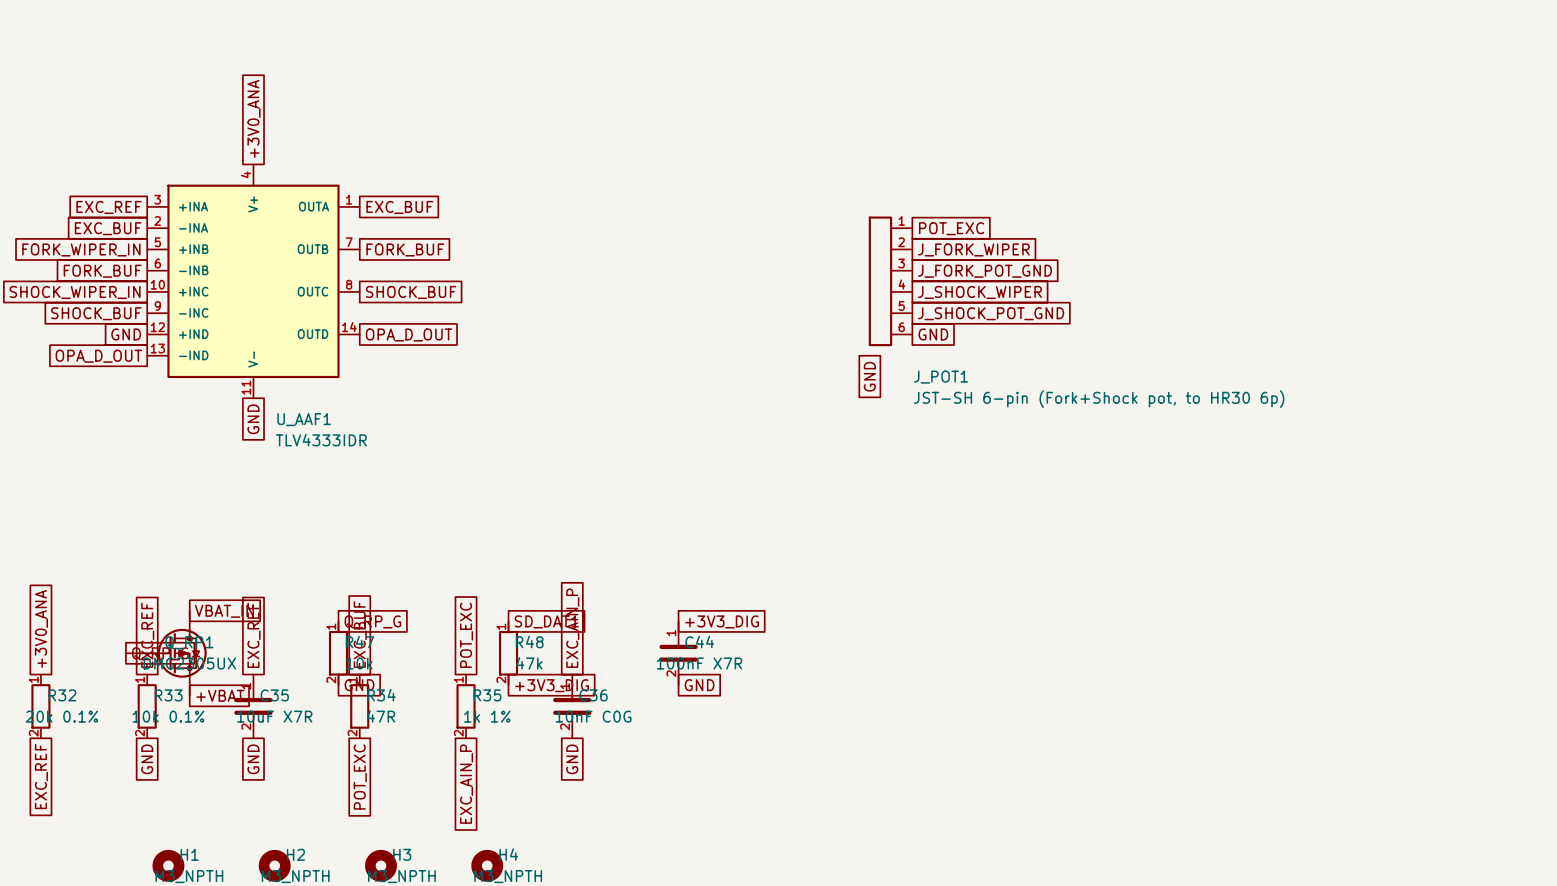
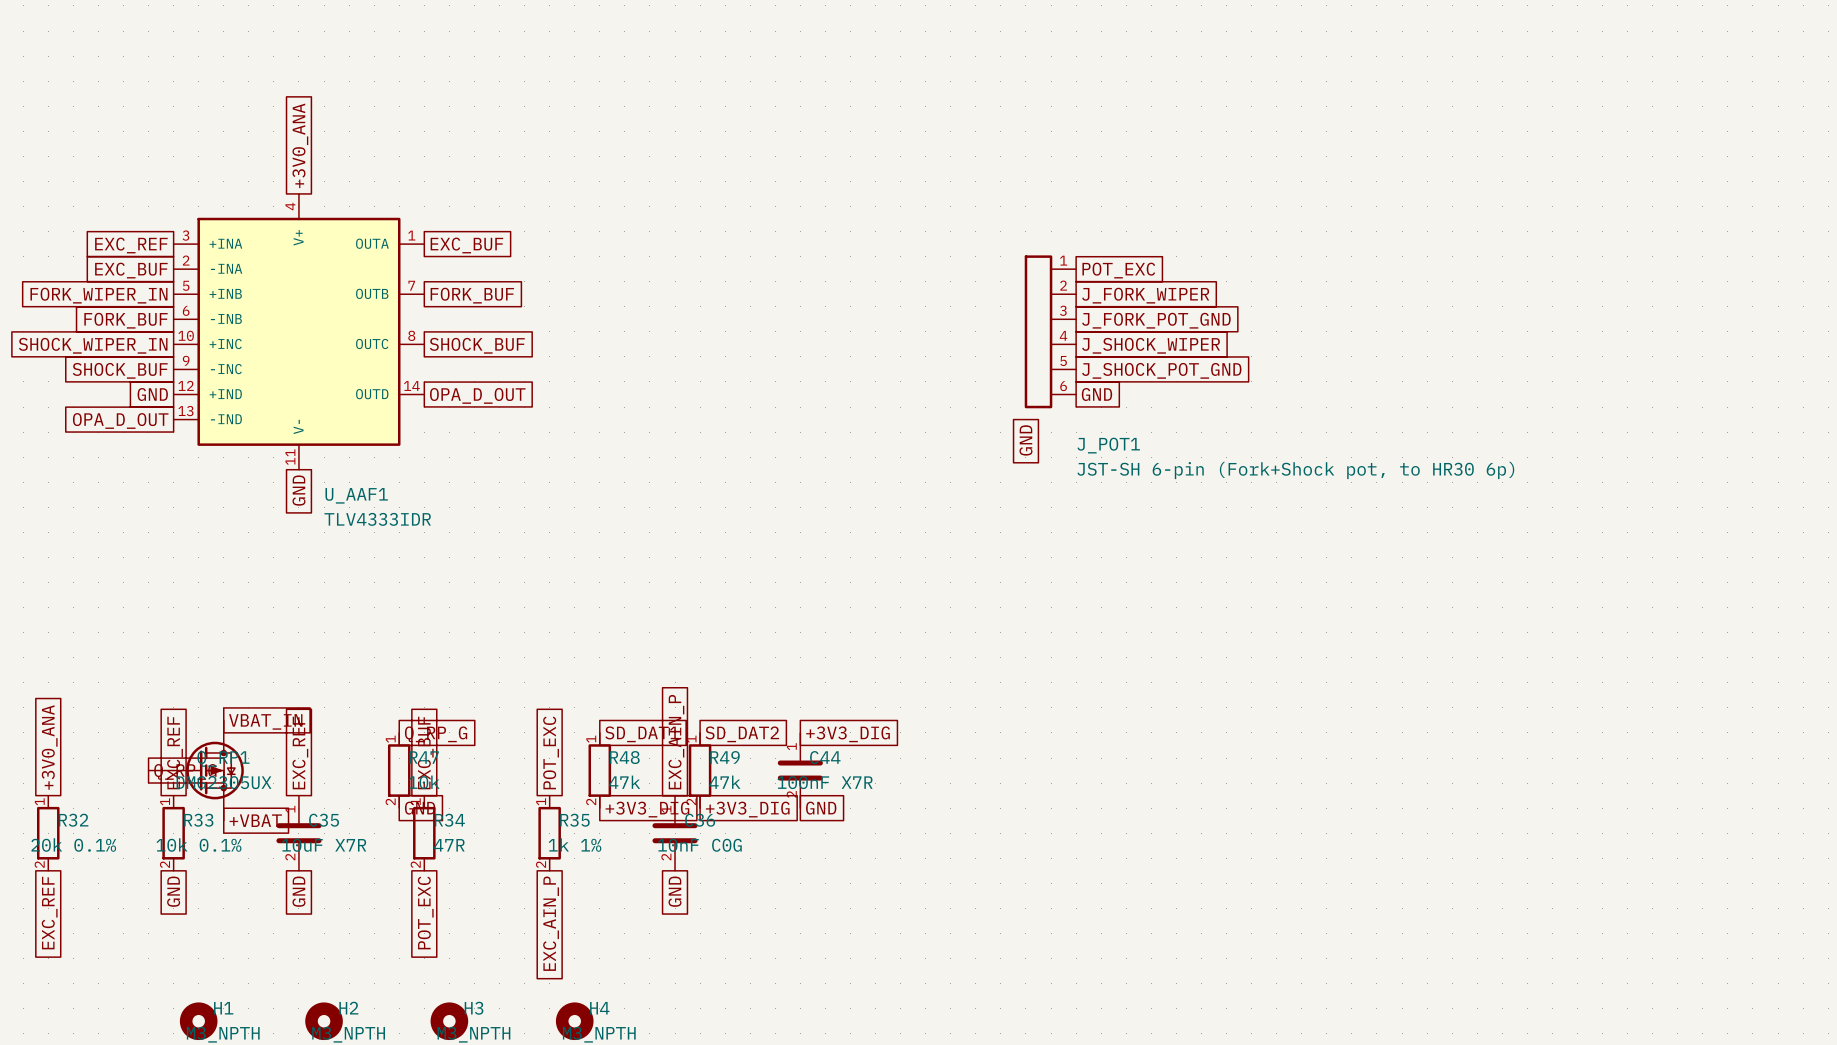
global label: none -> SD_DAT2 (742, 734)
R49: none -> 47k (700, 770)
global label: none -> +3V3_DIG (747, 809)

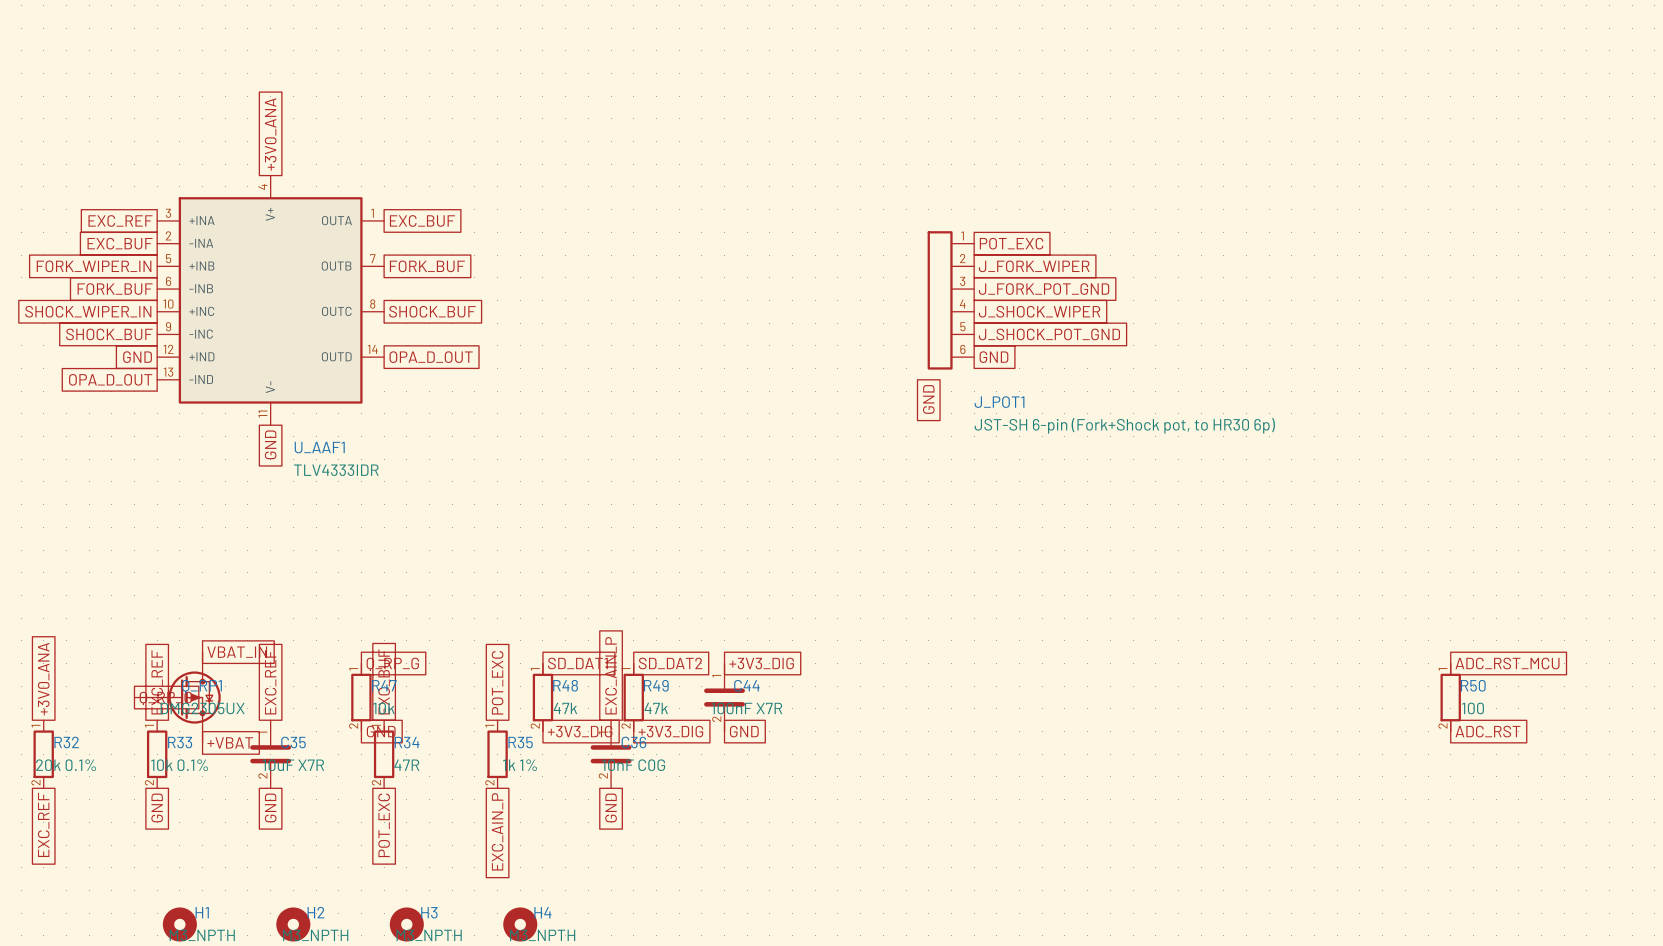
global label: none -> ADC_RST_MCU (1507, 663)
R50: none -> 100 (1450, 697)
global label: none -> ADC_RST (1487, 731)

